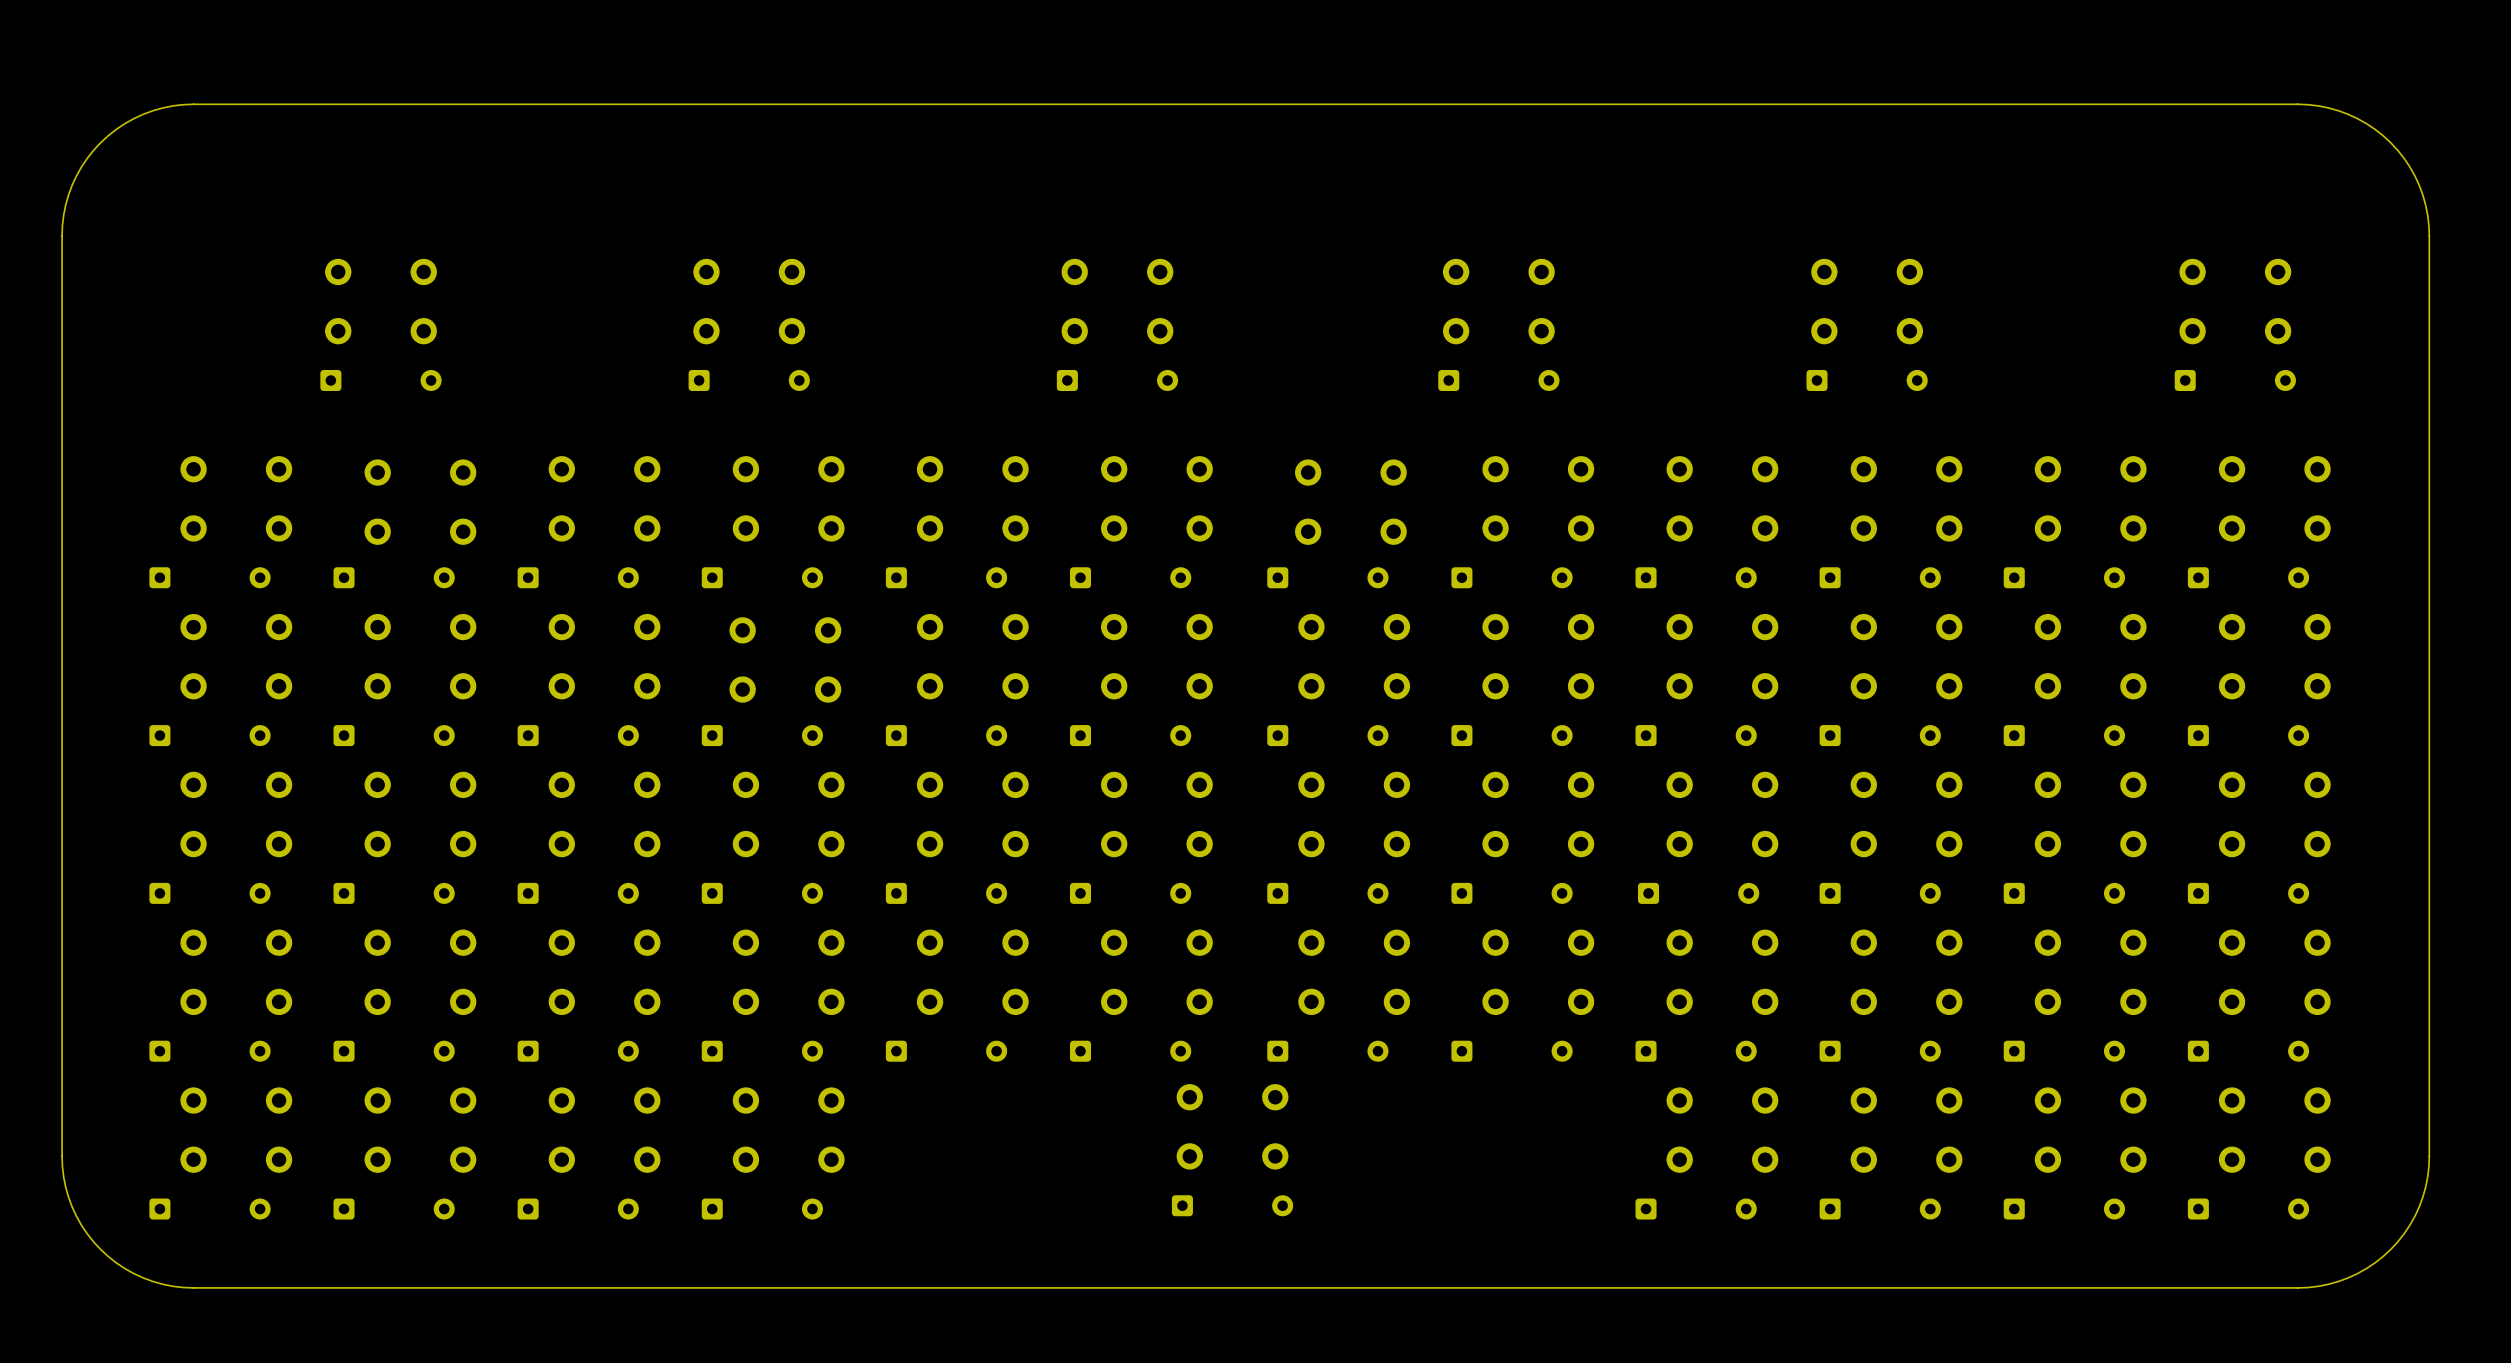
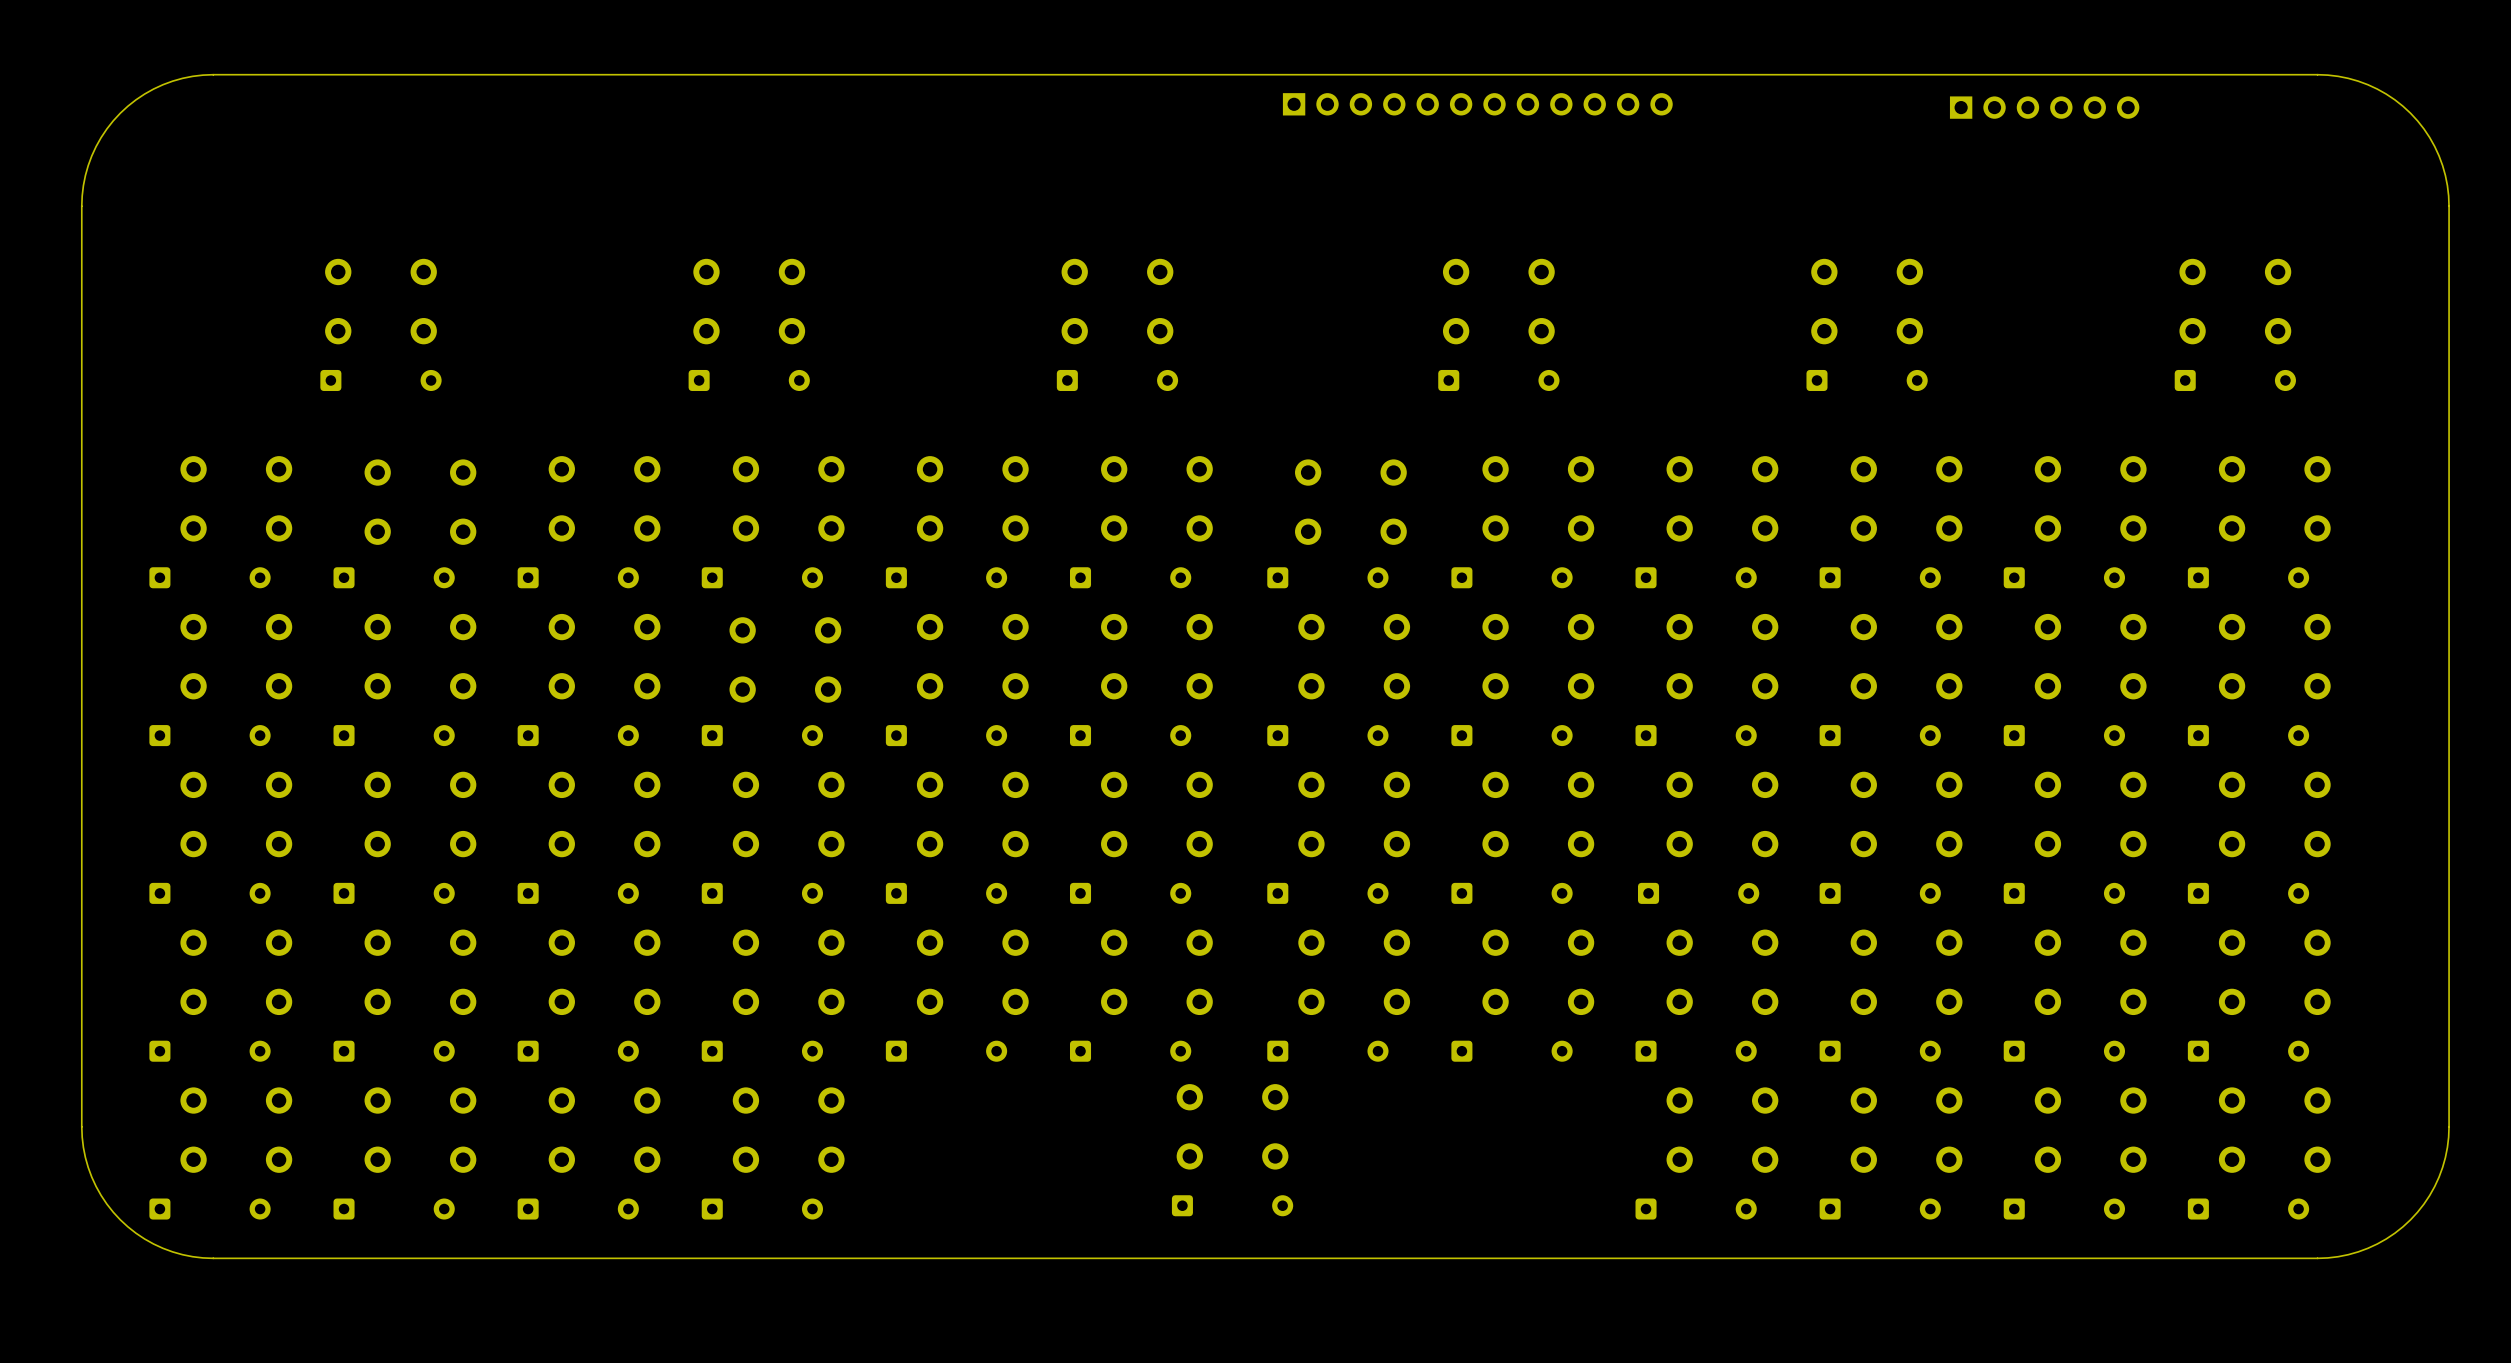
part: none -> (1477, 104)
board edge: (2297, 104) (193, 104) (162, 107) (133, 118) (108, 135) (87, 158) (72, 185) (65, 205) (62, 225) (62, 1156) (65, 1187) (76, 1216) (87, 1233) (100, 1249) (124, 1268) (143, 1277) (162, 1284) (193, 1287) (2297, 1287) (2328, 1284) (2357, 1273) (2383, 1256) (2404, 1233) (2414, 1216) (2422, 1197) (2428, 1166) (2428, 225) (2425, 205) (2414, 176) (2397, 150) (2383, 135) (2357, 118) (2338, 110) (2318, 105) (2297, 104) -> (2317, 74) (213, 74) (182, 78) (153, 89) (127, 106) (106, 128) (96, 146) (88, 165) (82, 195) (81, 1126) (85, 1157) (96, 1186) (106, 1204) (120, 1219) (144, 1238) (172, 1251) (192, 1256) (213, 1258) (2317, 1258) (2348, 1254) (2377, 1244) (2402, 1226) (2423, 1204) (2434, 1186) (2442, 1167) (2448, 1137) (2448, 195) (2442, 165) (2434, 146) (2423, 128) (2410, 113) (2394, 99) (2367, 84) (2348, 78) (2317, 74)
part: none -> (2044, 107)

